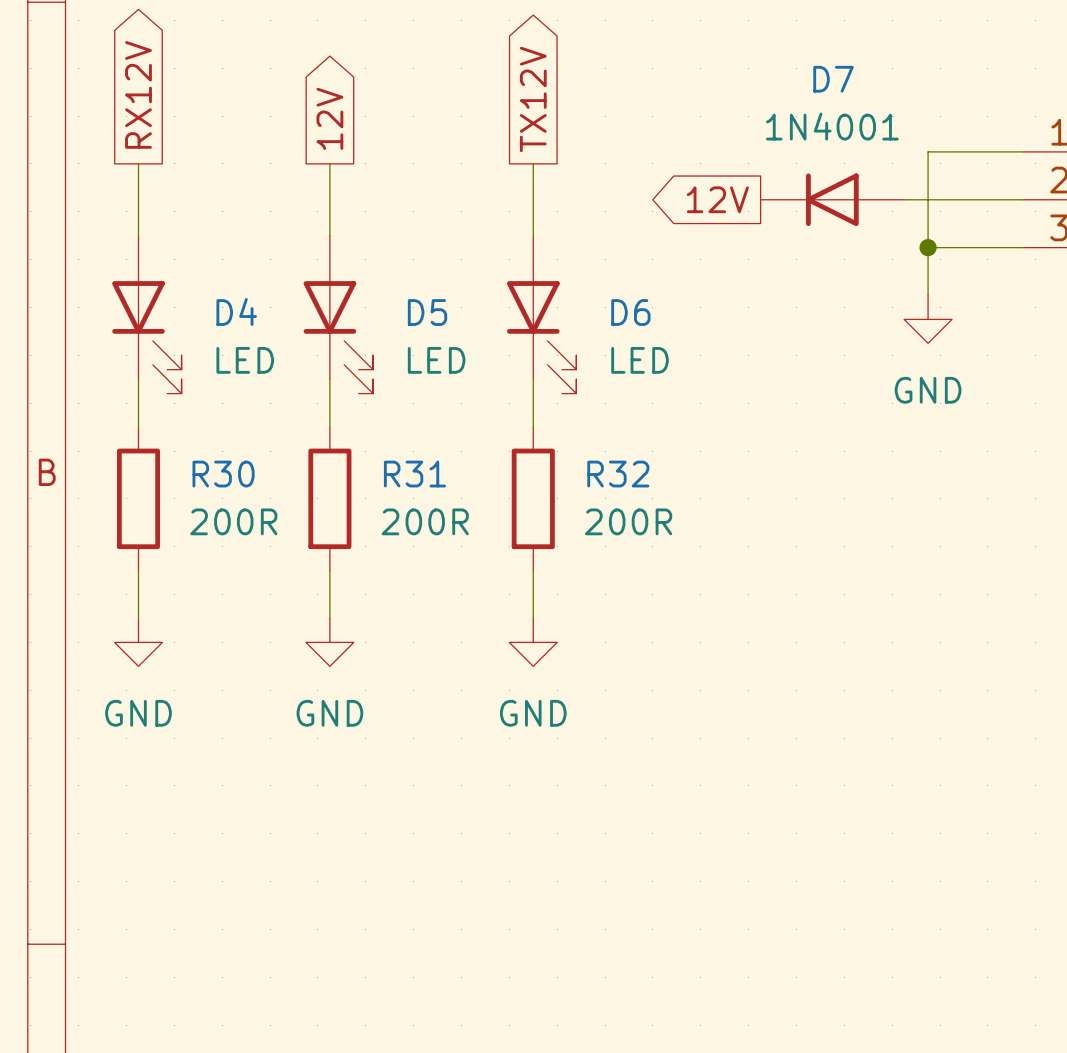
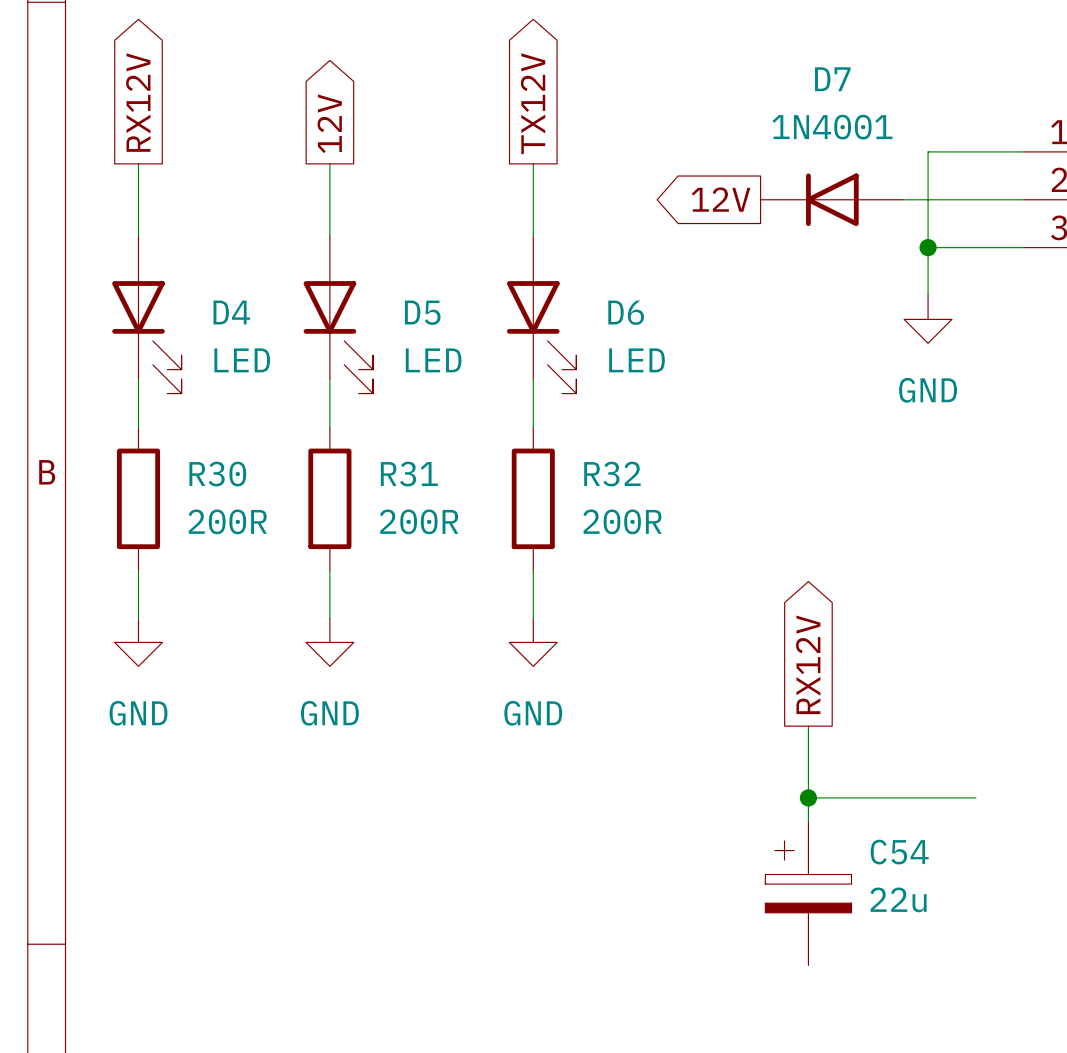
global label: none -> RX12V (808, 664)
wire: none -> (808, 726) (808, 821)
wire: none -> (808, 797) (975, 797)
junction: none -> (808, 797)
C54: none -> 22u (808, 893)

